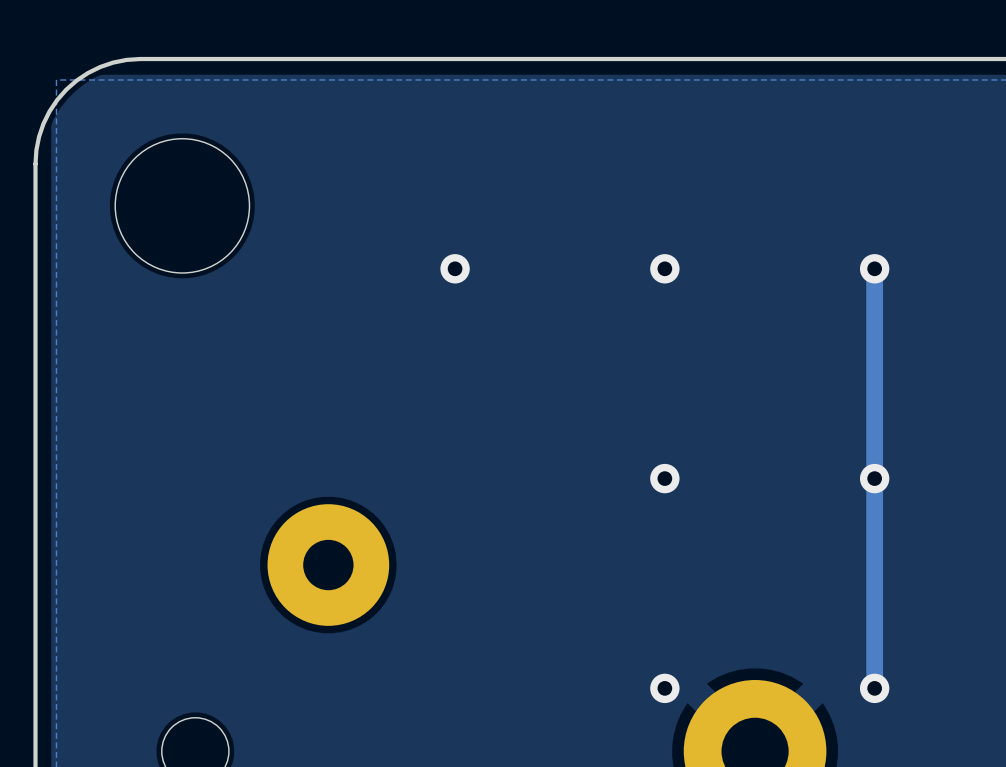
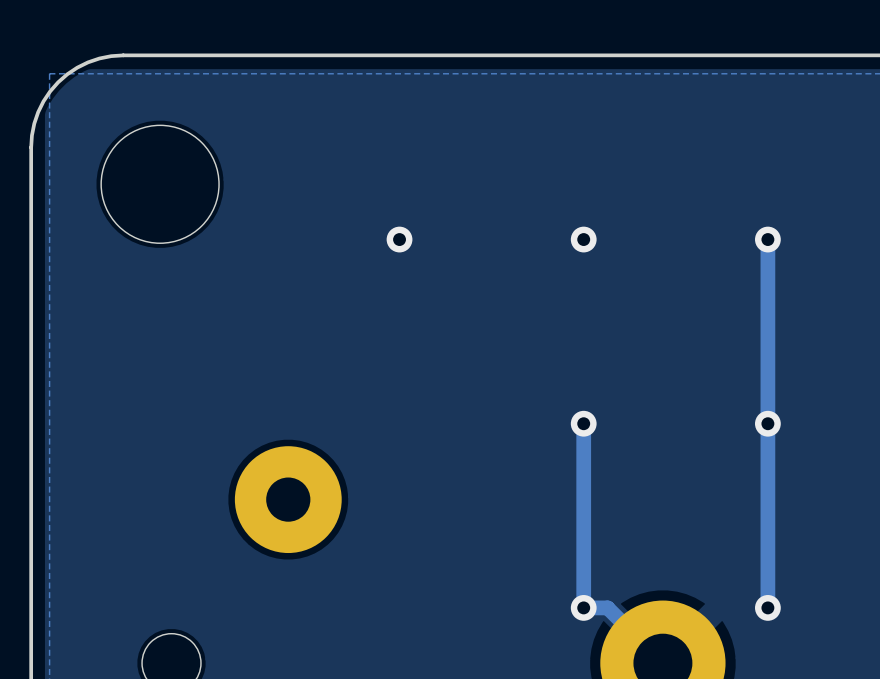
track: none -> (583, 423) (583, 607) (607, 607) (662, 663)

